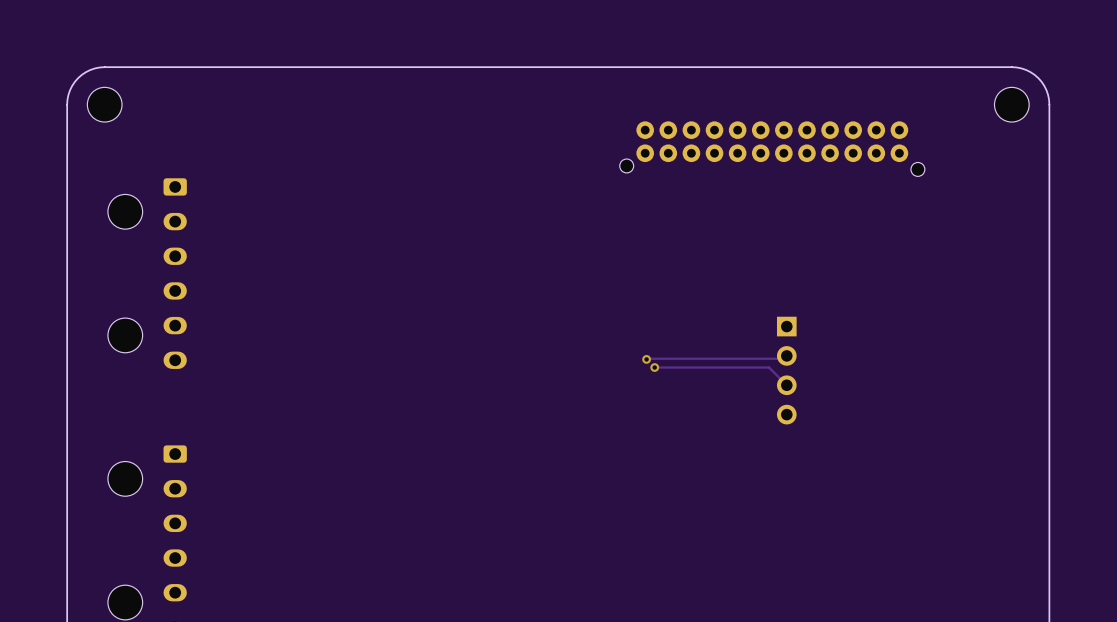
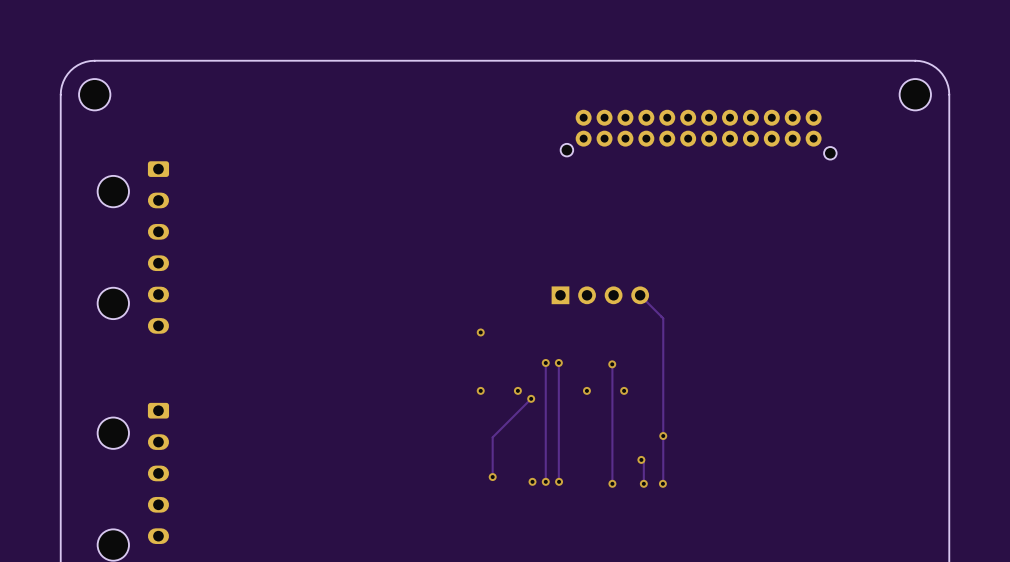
track: none -> (640, 295) (661, 316)
track: none -> (661, 316) (663, 318) (662, 483)
track: (786, 355) (783, 358) (646, 359) -> none
via: (646, 359) -> none
via: none -> (480, 332)
track: (654, 367) (769, 367) (786, 385) -> none
via: (654, 367) -> none
part rotation: 0° (786, 370) -> 90° counterclockwise (600, 295)
part position: (786, 370) -> (600, 295)
track: none -> (545, 362) (545, 481)
via: none -> (545, 362)
track: none -> (558, 362) (559, 484)
via: none -> (558, 362)
track: none -> (612, 364) (612, 483)
via: none -> (612, 364)
via: none -> (480, 390)
via: none -> (517, 390)
via: none -> (586, 390)
via: none -> (624, 390)
track: none -> (531, 398) (492, 437) (492, 477)
via: none -> (531, 398)
via: none -> (663, 436)
track: none -> (641, 459) (643, 462) (643, 483)
via: none -> (641, 459)
via: none -> (492, 477)
via: none -> (532, 481)
via: none -> (545, 481)
via: none -> (559, 481)
via: none -> (612, 483)
via: none -> (643, 483)
via: none -> (662, 483)

